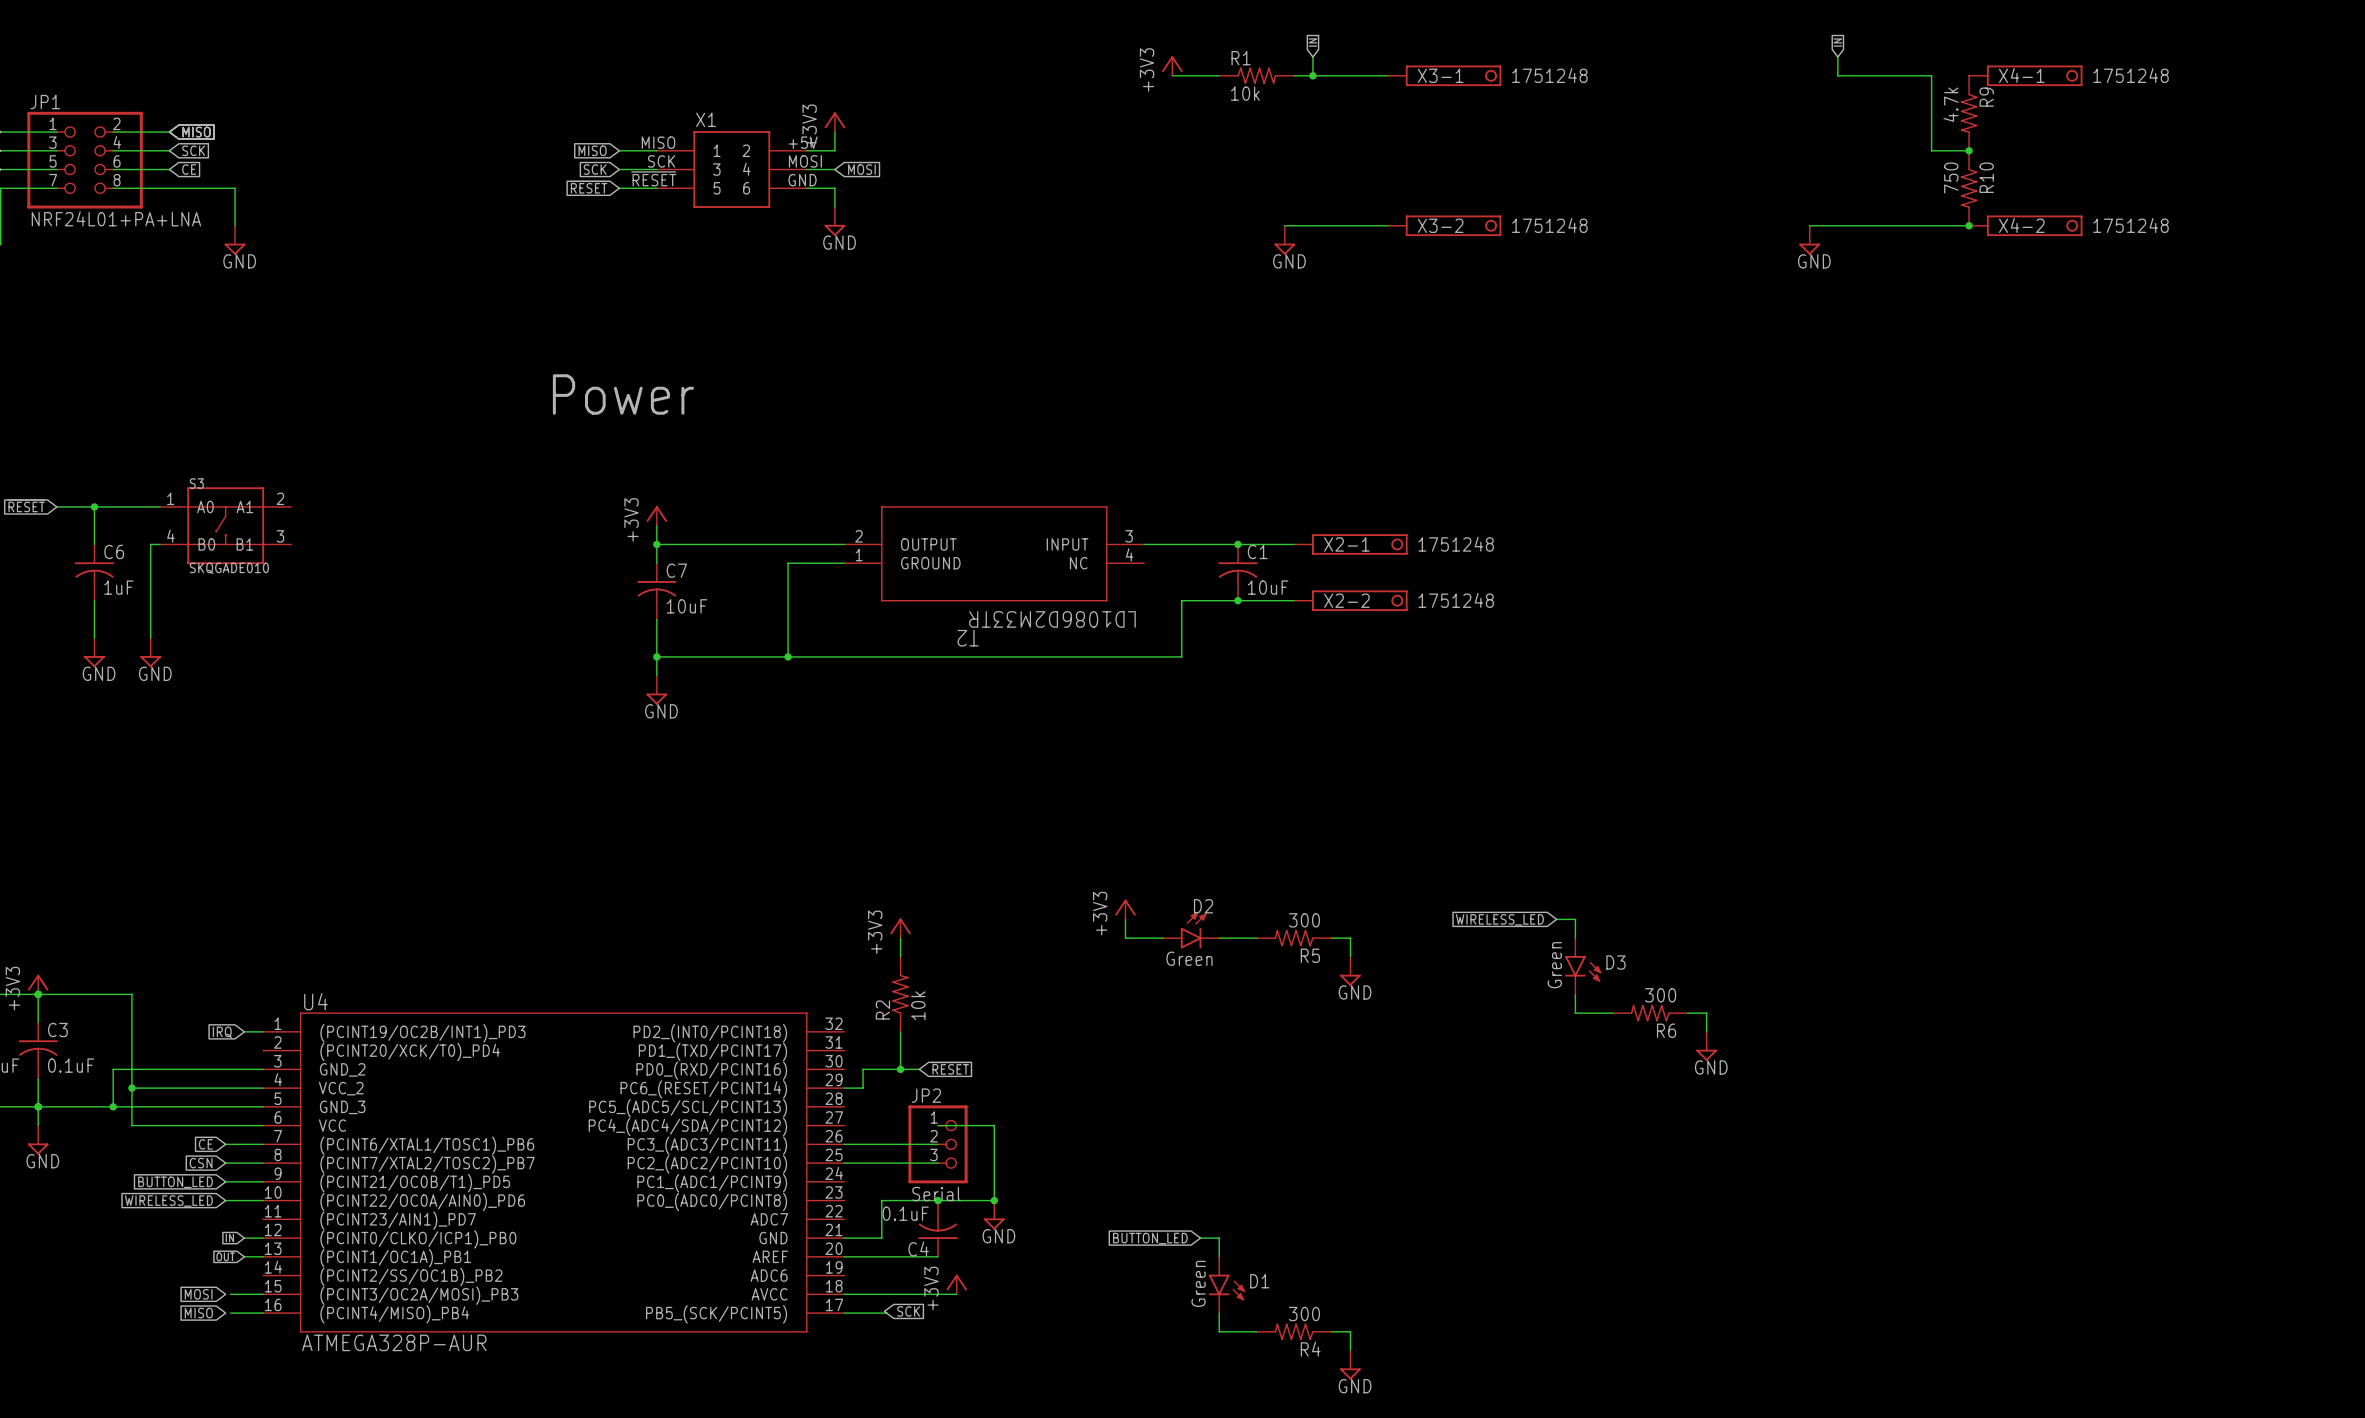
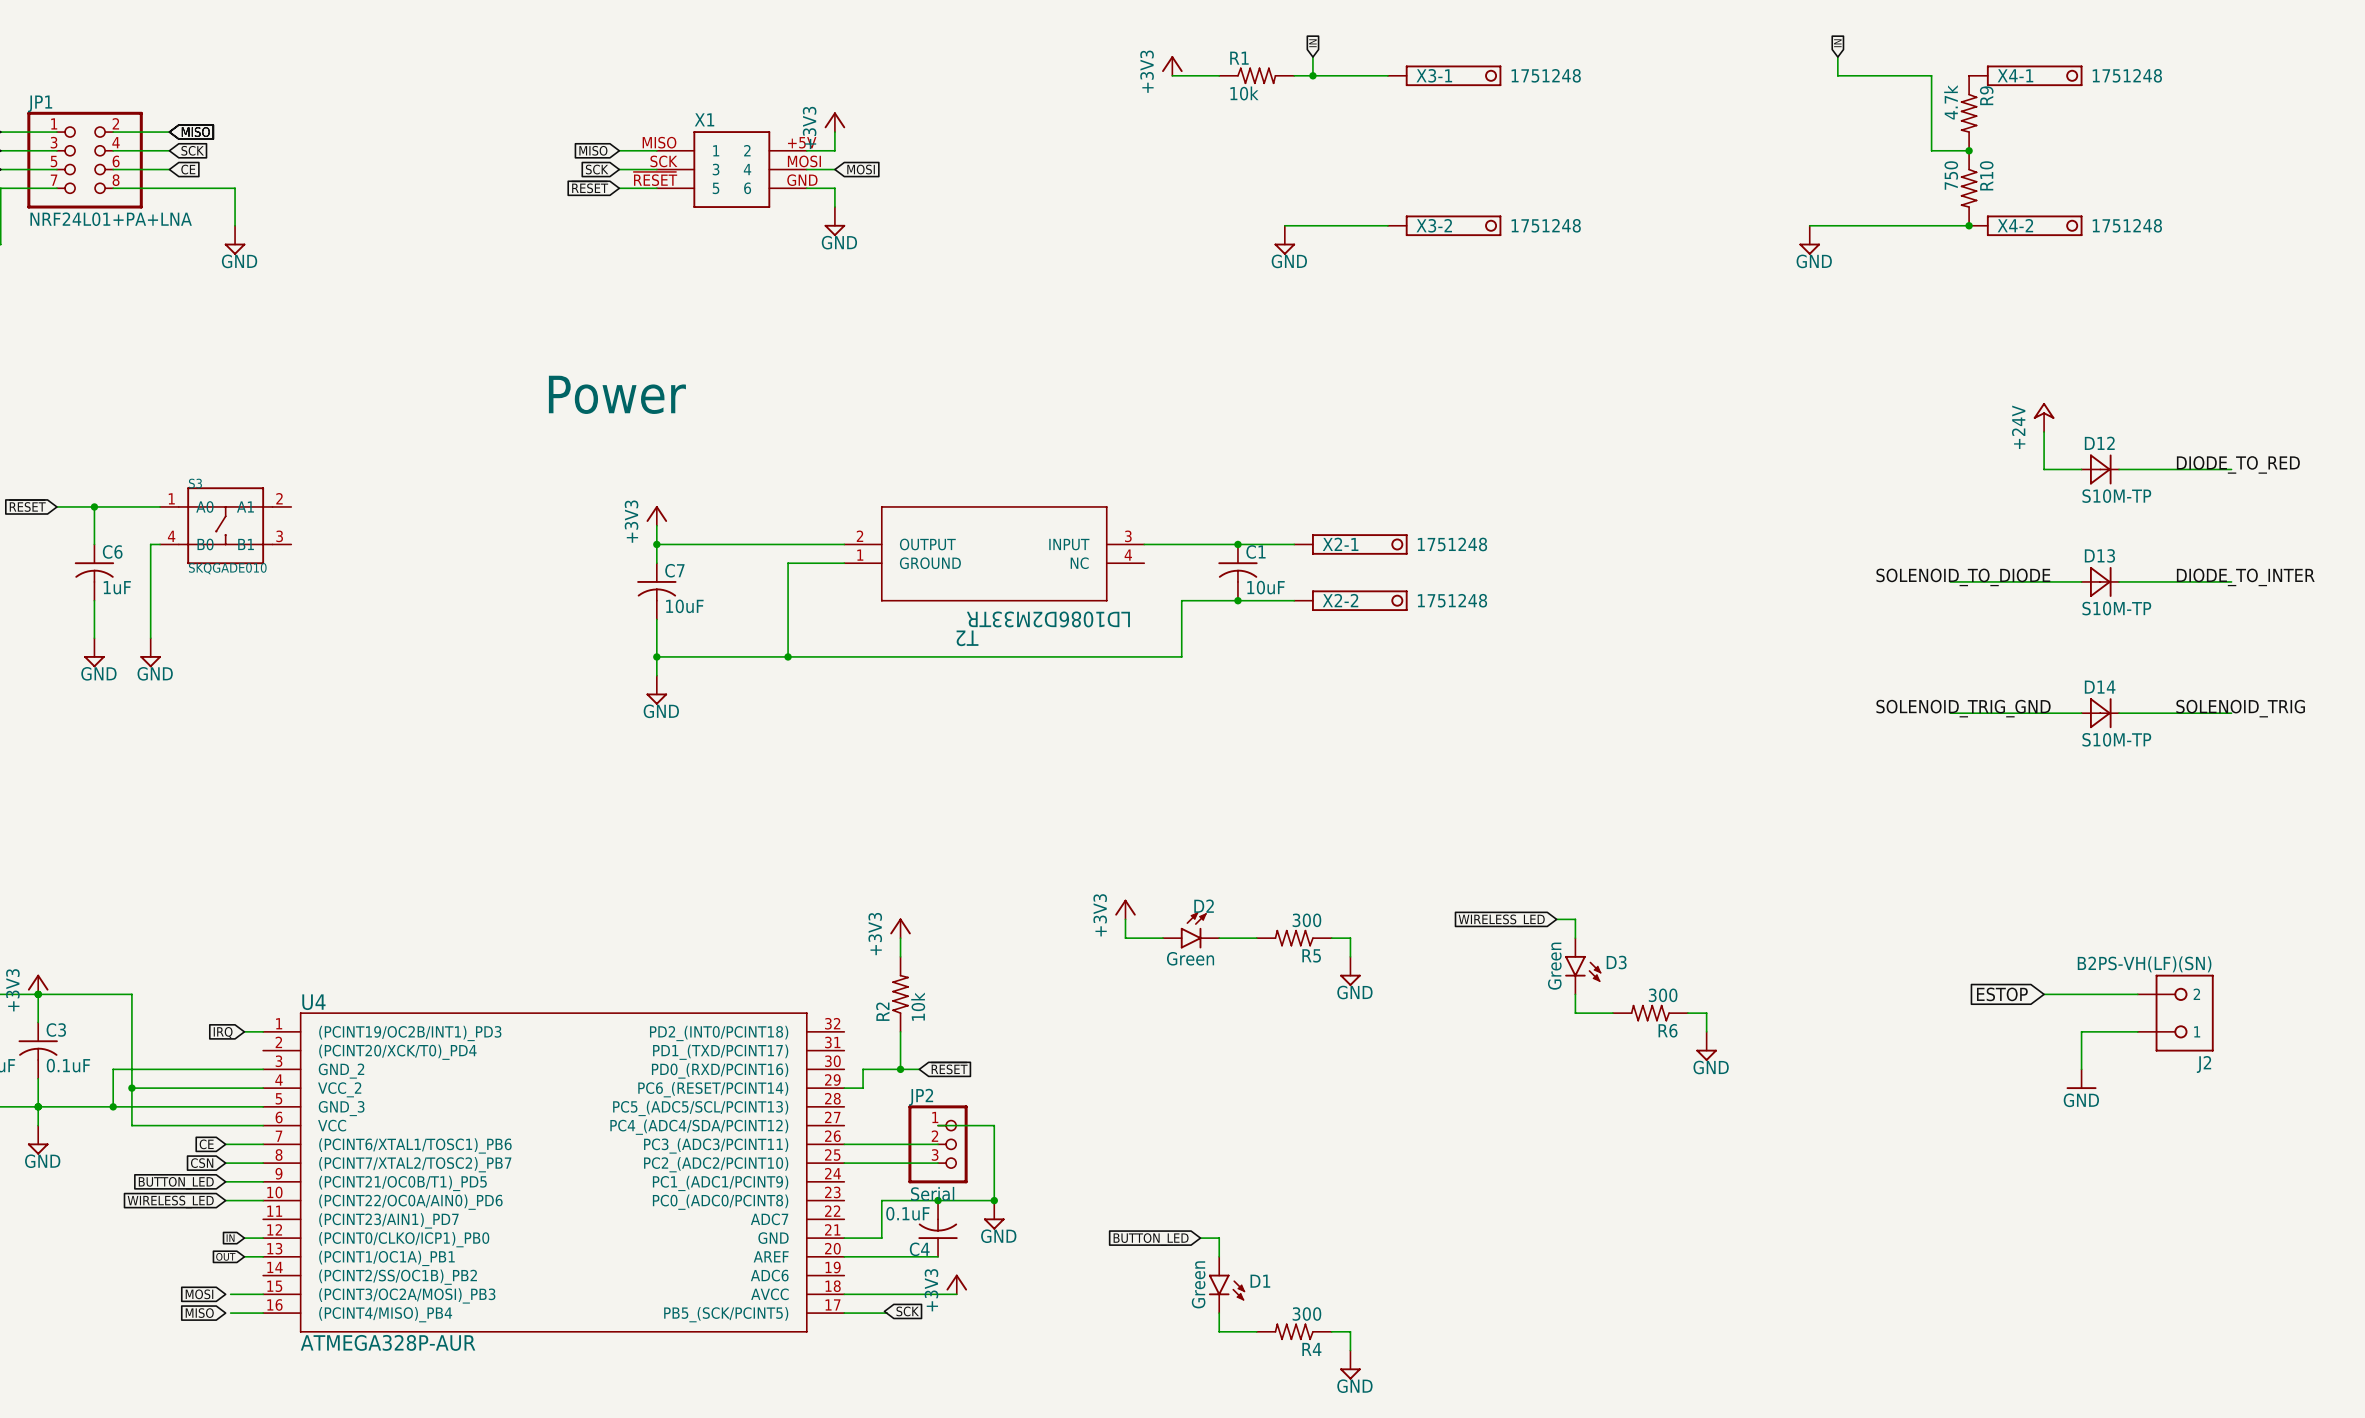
power symbol: none -> +24V (2044, 417)
wire: none -> (2044, 431) (2044, 469) (2081, 469)
label: none -> DIODE_TO_RED (2238, 464)
D12: none -> S10M-TP (2100, 469)
wire: none -> (2119, 469) (2231, 469)
label: none -> SOLENOID_TO_DIODE (1963, 577)
label: none -> DIODE_TO_INTER (2245, 577)
wire: none -> (1950, 581) (2081, 581)
D13: none -> S10M-TP (2100, 581)
wire: none -> (2119, 581) (2231, 581)
label: none -> SOLENOID_TRIG_GND (1963, 708)
label: none -> SOLENOID_TRIG (2240, 708)
wire: none -> (1950, 713) (2081, 713)
D14: none -> S10M-TP (2100, 713)
wire: none -> (2119, 713) (2231, 713)
global label: none -> ESTOP (2002, 994)
wire: none -> (2044, 994) (2137, 994)
J2: none -> B2PS-VH(LF)(SN) (2175, 1013)
wire: none -> (2137, 1031) (2081, 1031) (2081, 1069)
power symbol: none -> GND (2081, 1079)

